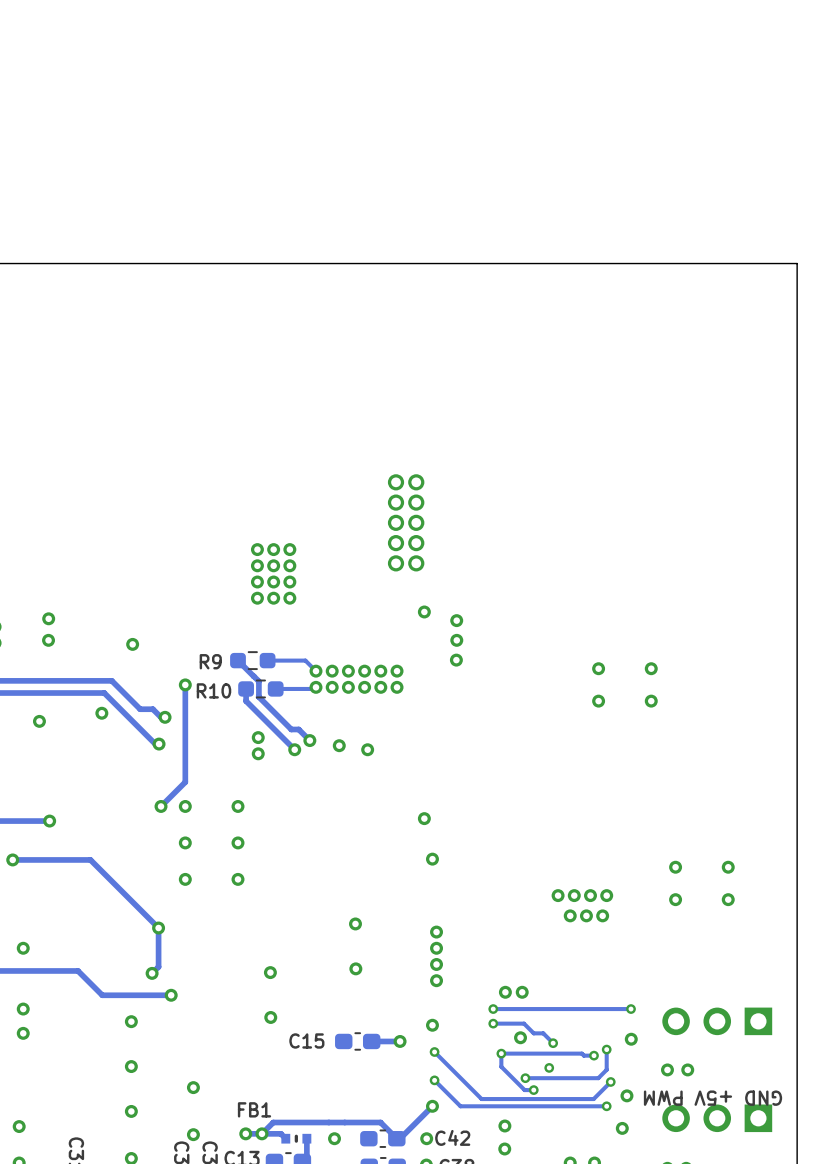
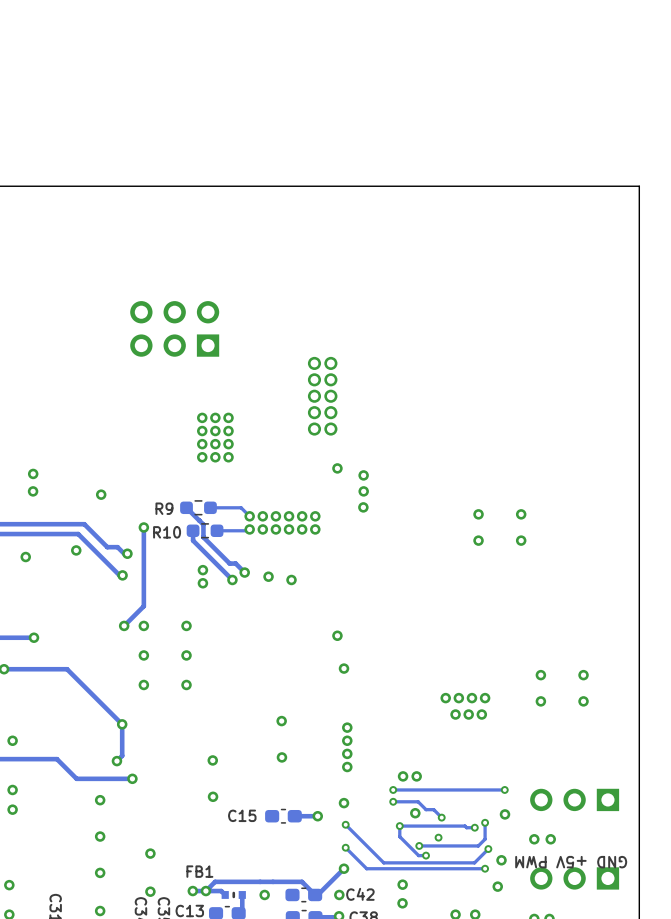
part: none -> (174, 328)

